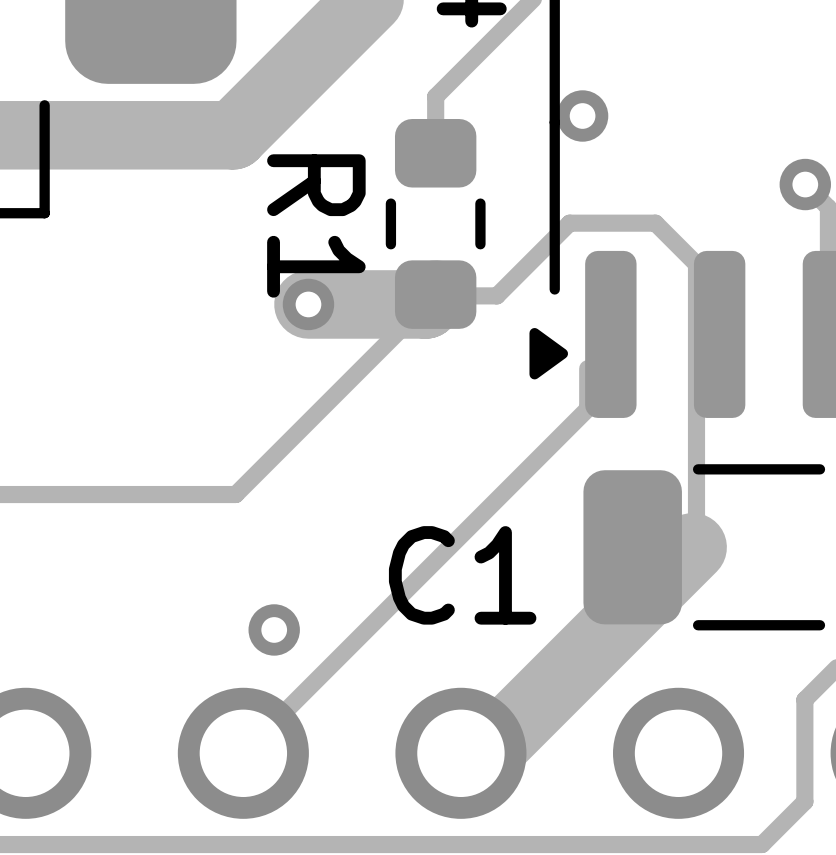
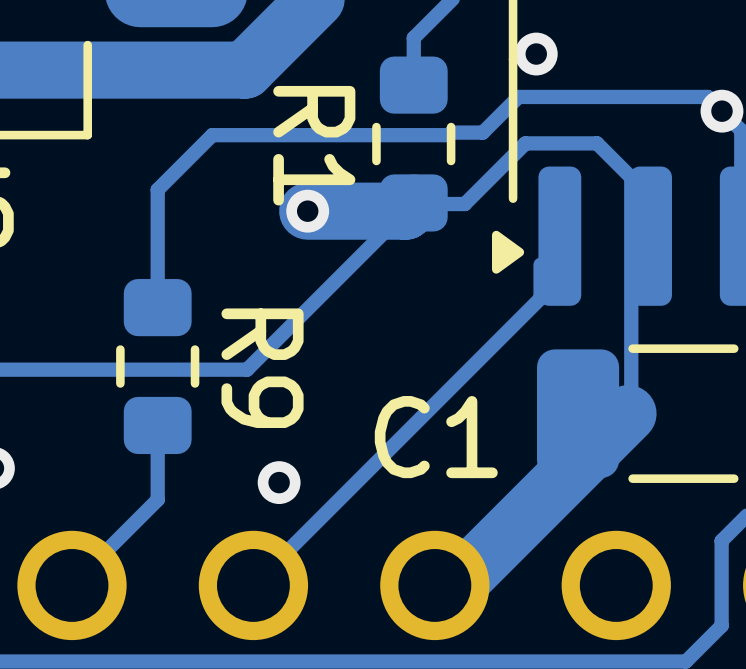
track: none -> (721, 111) (707, 96) (518, 96) (482, 132) (451, 132) (448, 135) (212, 135) (157, 189) (157, 307)
R9: none -> (157, 366)
track: none -> (157, 425) (157, 499) (71, 585)

